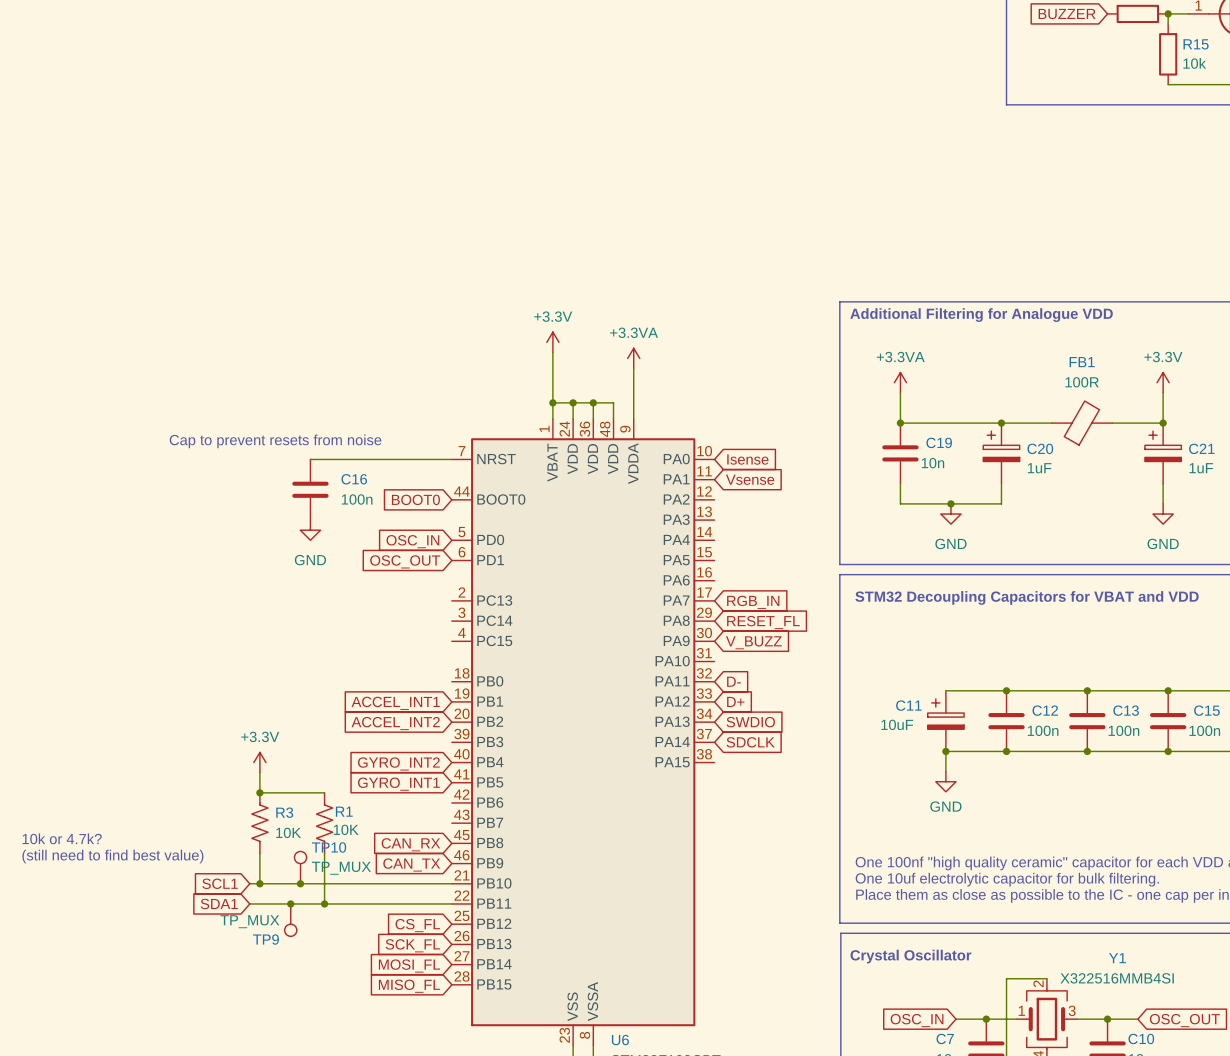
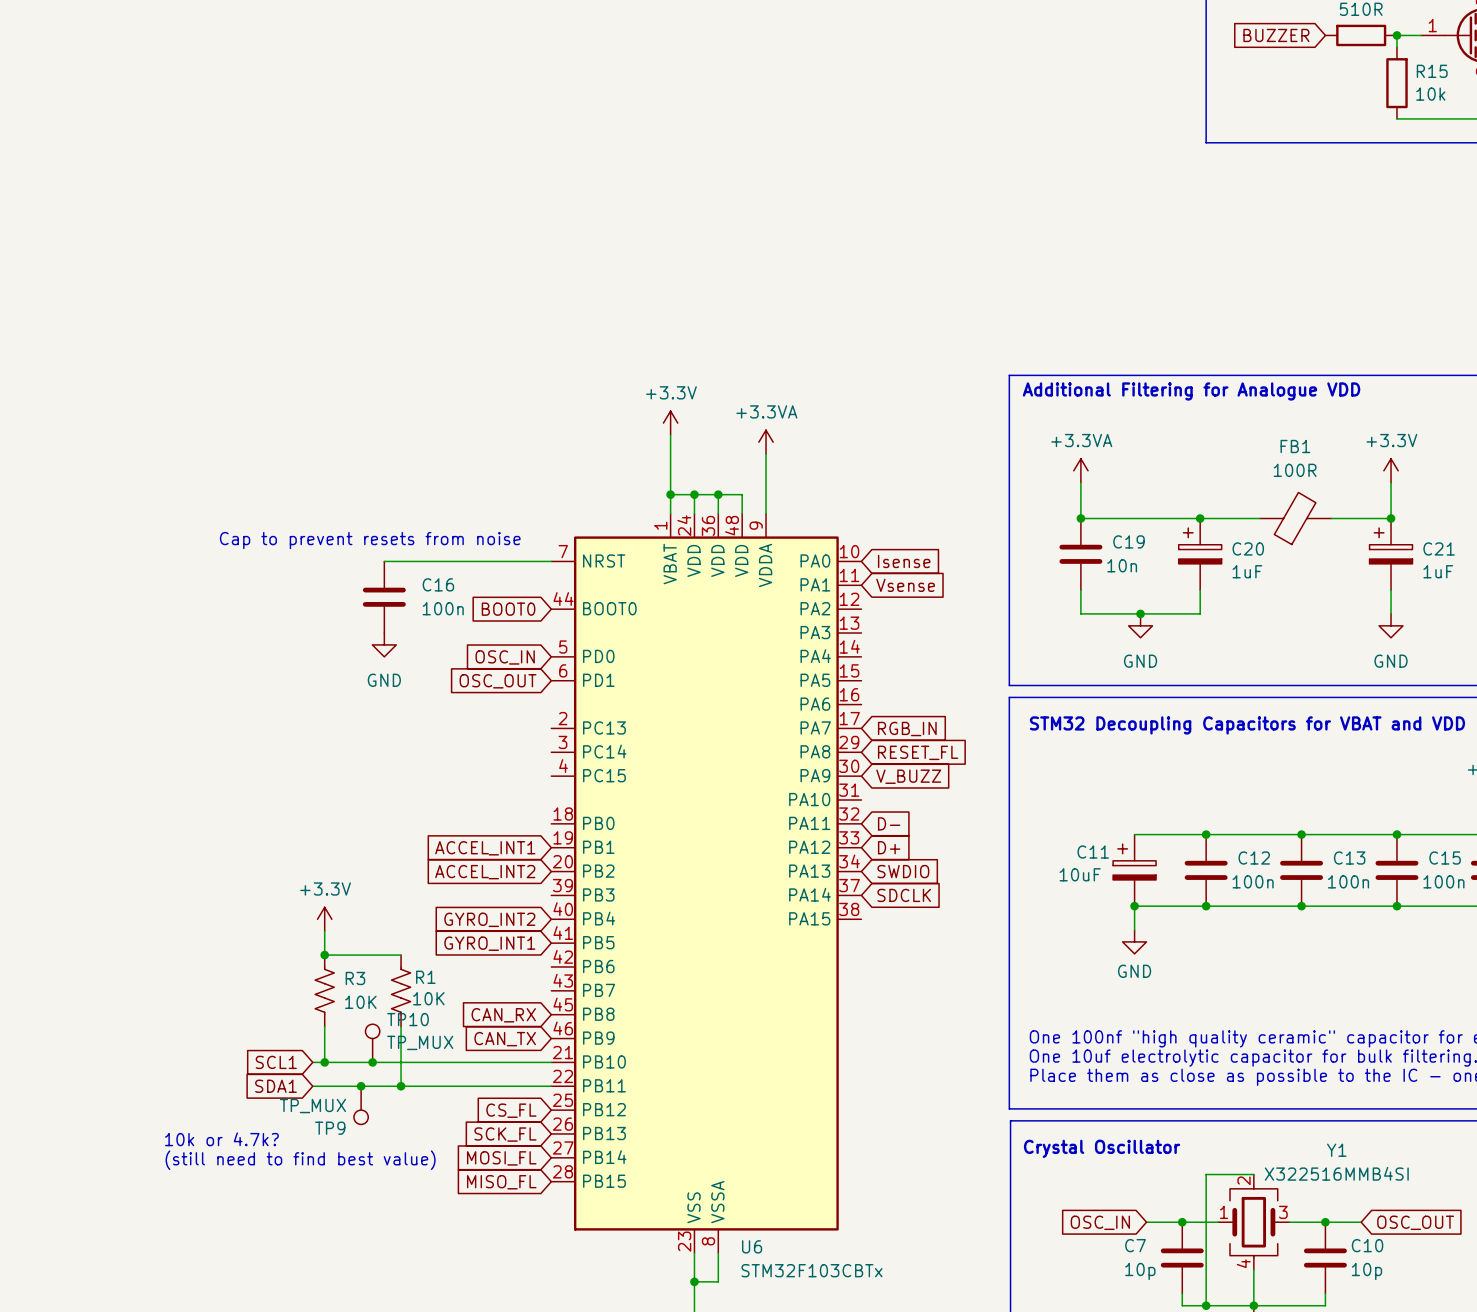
text position: 10k or 4.7k? (62, 838) -> 10k or 4.7k? (221, 1139)
text position: (still need to find best value) (112, 856) -> (still need to find best value) (300, 1160)

